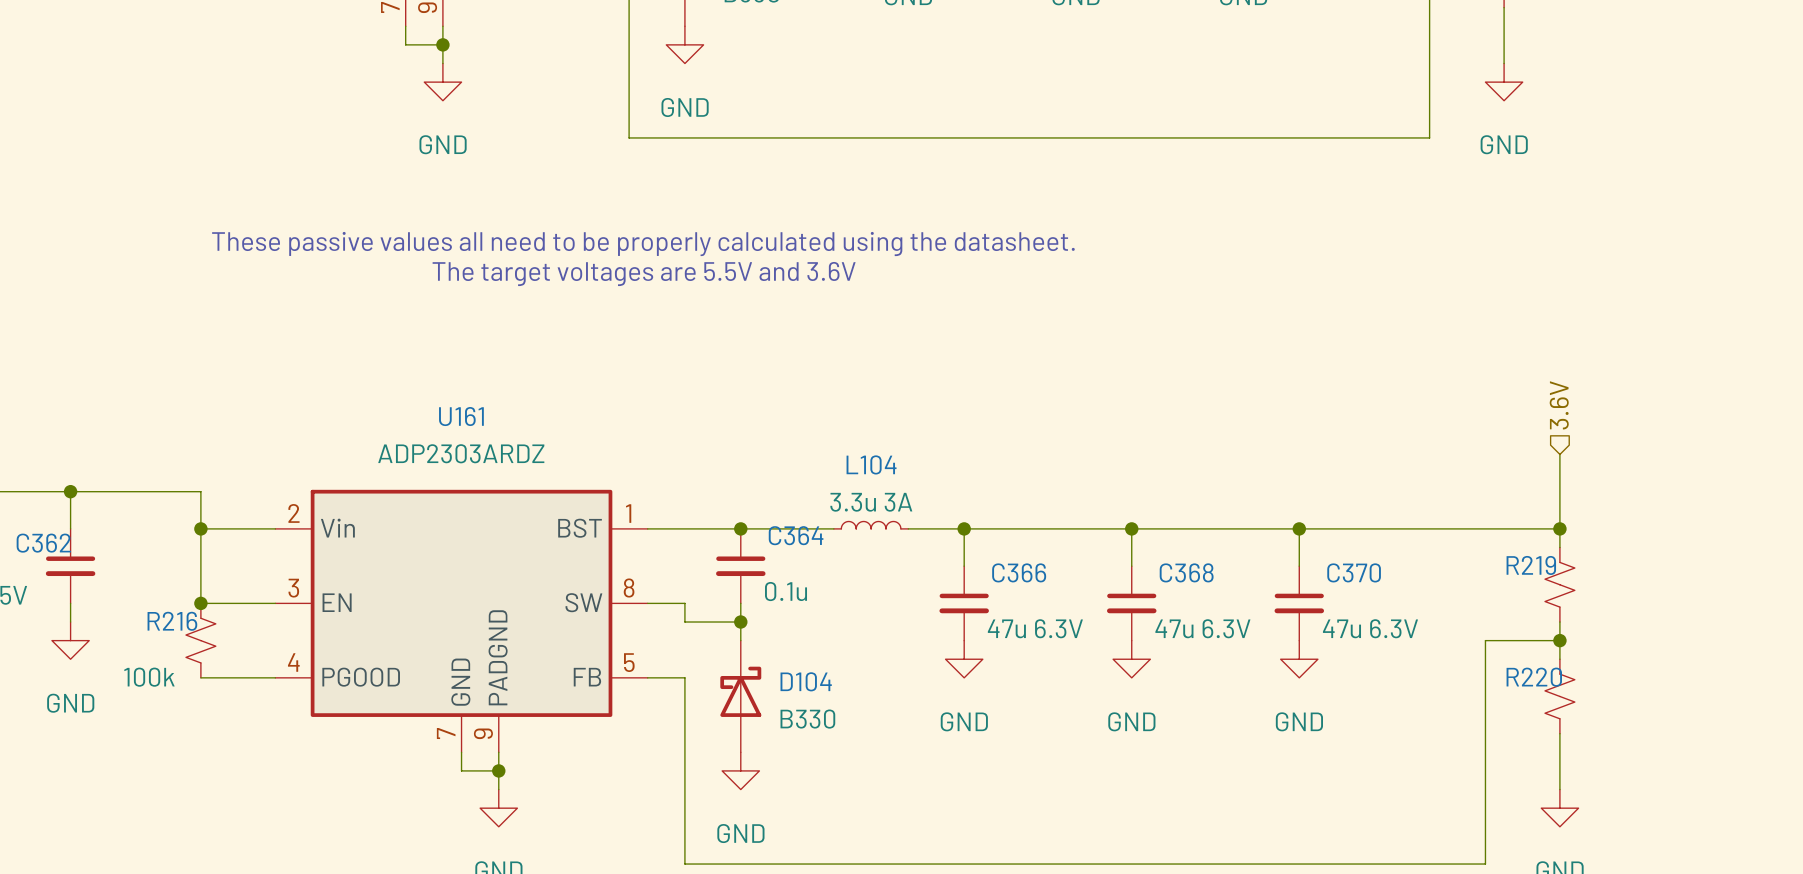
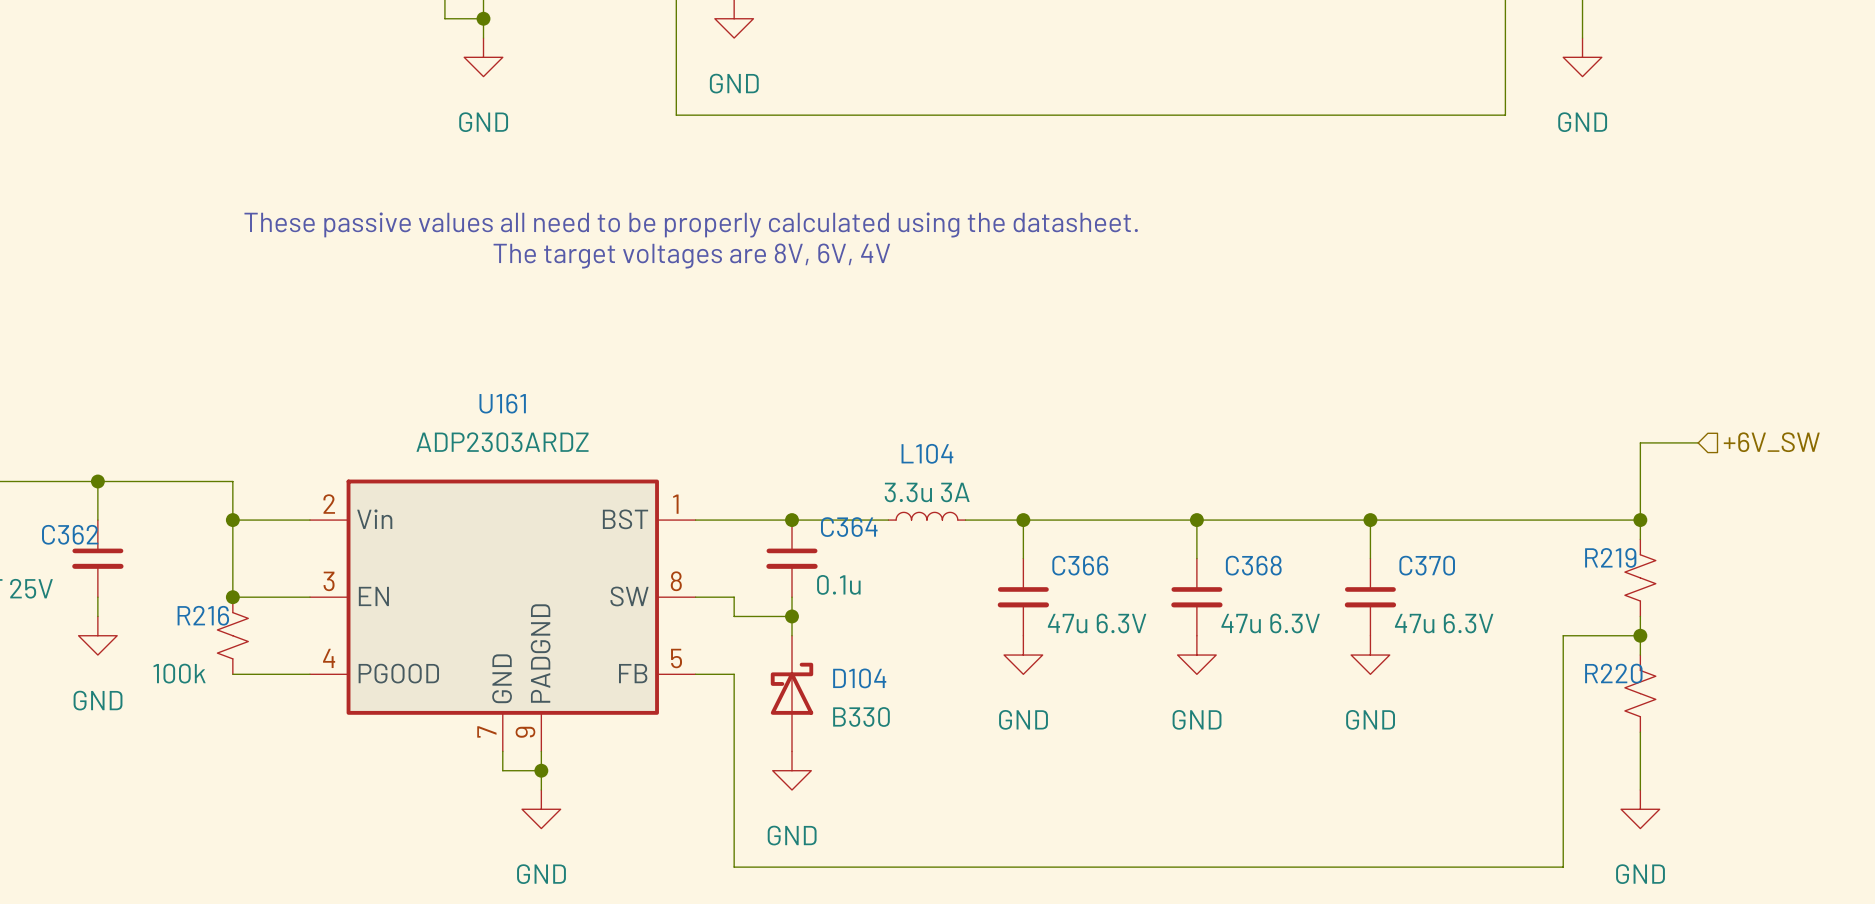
text: The target voltages are 5.5V and 3.6V (644, 274) -> The target voltages are 8V, 6V, 4V (691, 256)
hierarchical label: 3.6V (1559, 405) -> none
hierarchical label: none -> +6V_SW (1771, 442)
wire: none -> (1640, 442) (1698, 442)

